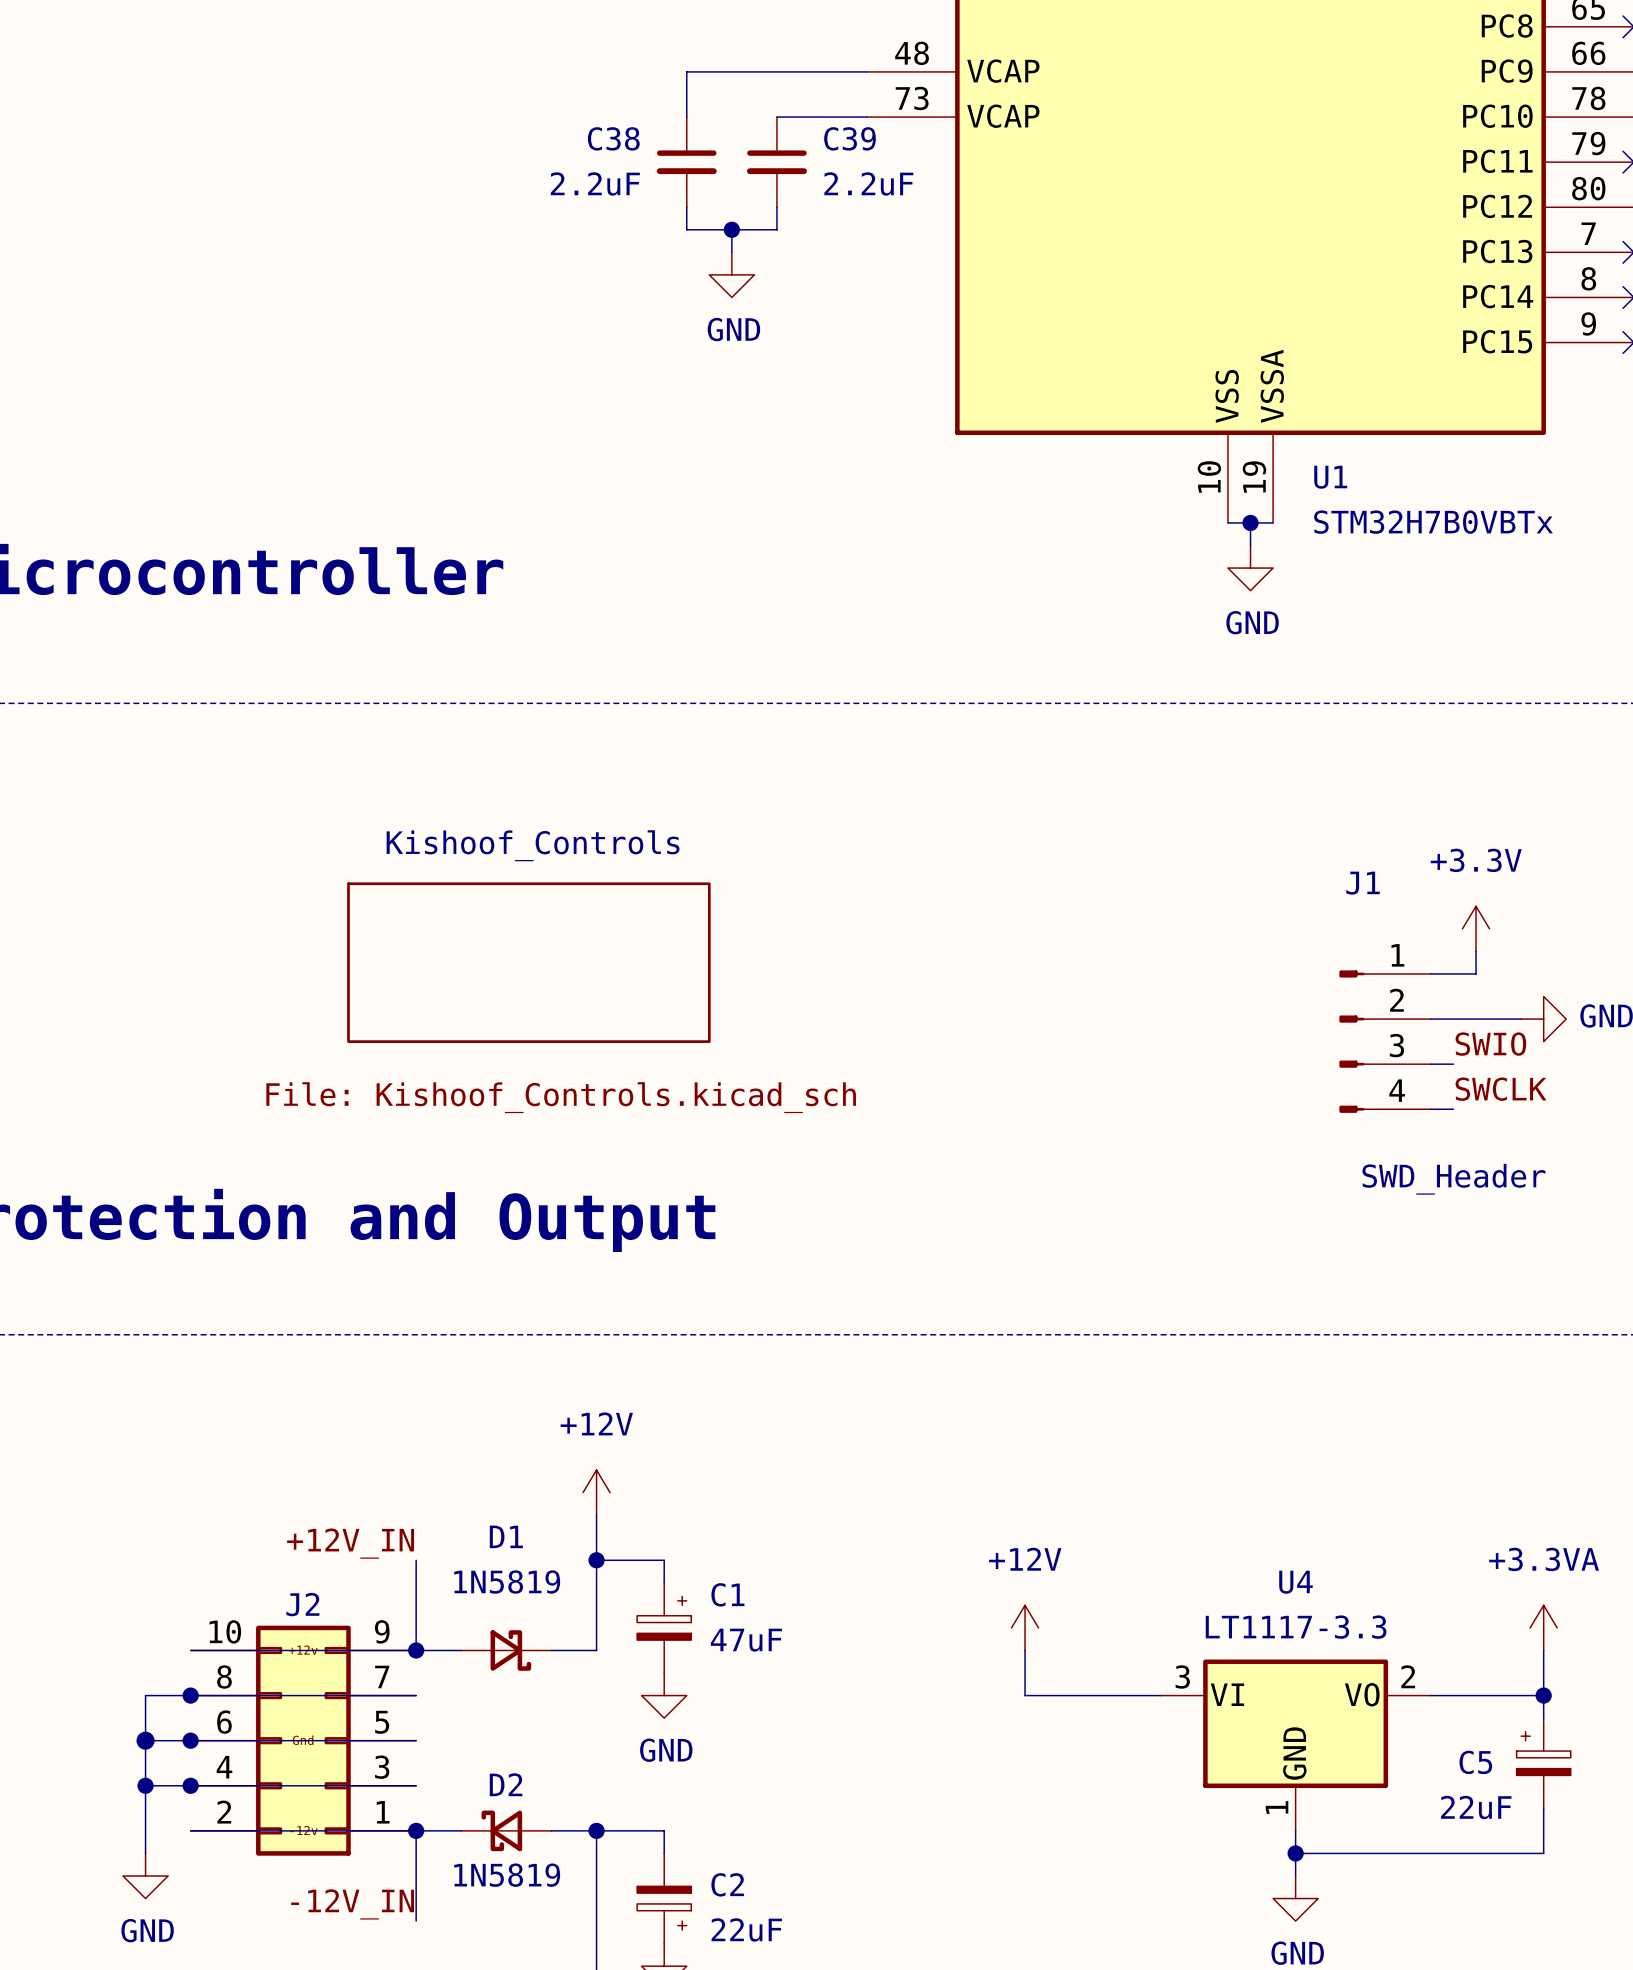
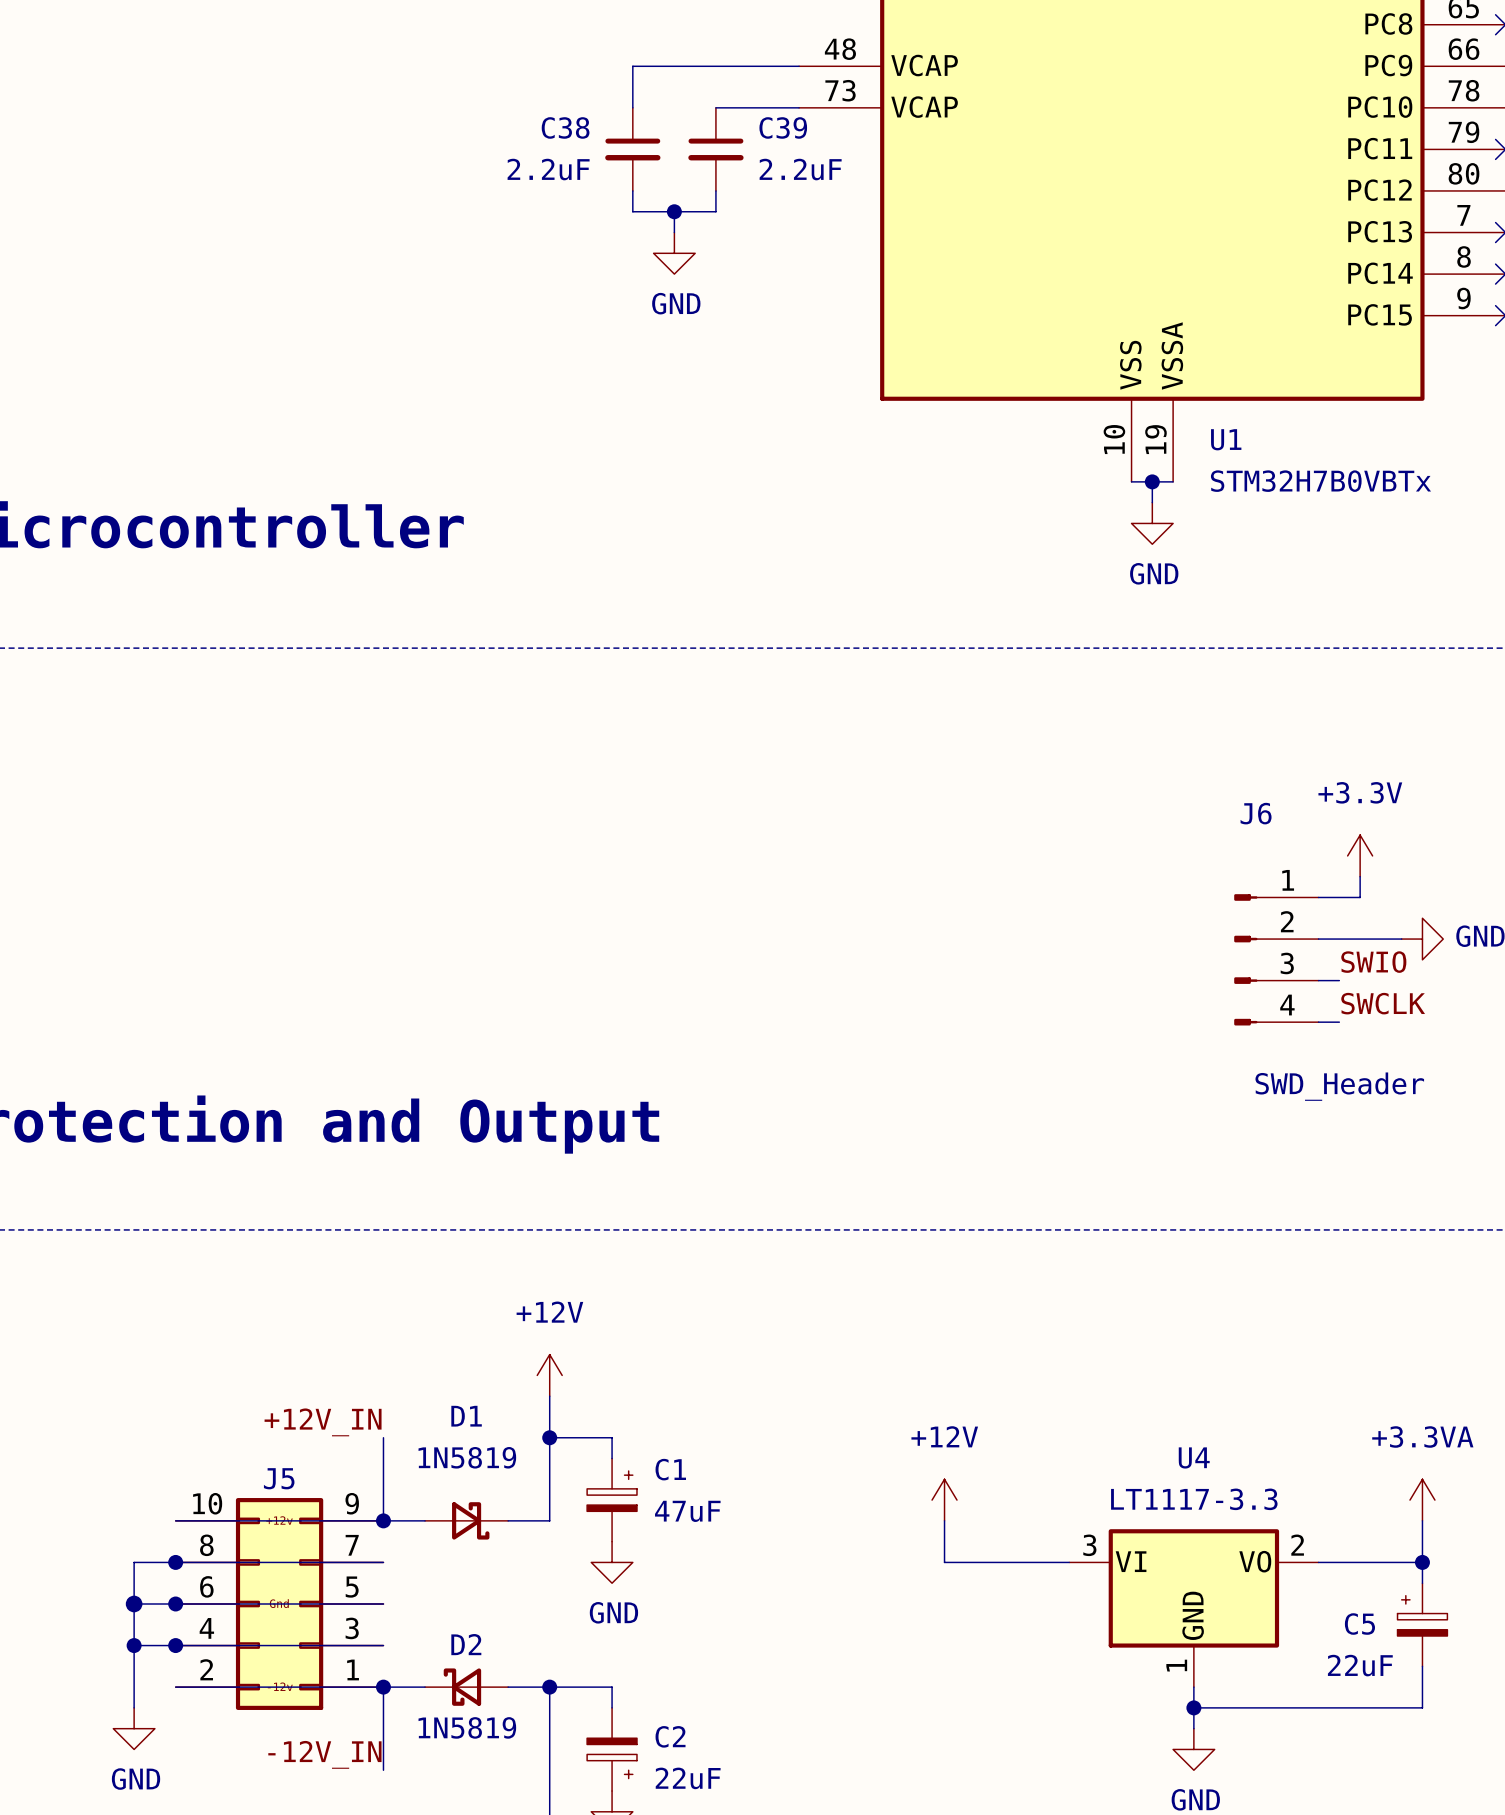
J1 name: J1 (1363, 883) -> J6 (1256, 813)
sheet Kishoof_Controls: File: Kishoof_Controls.kicad_sch (528, 962) -> none
J2 name: J2 (302, 1604) -> J5 (279, 1478)

